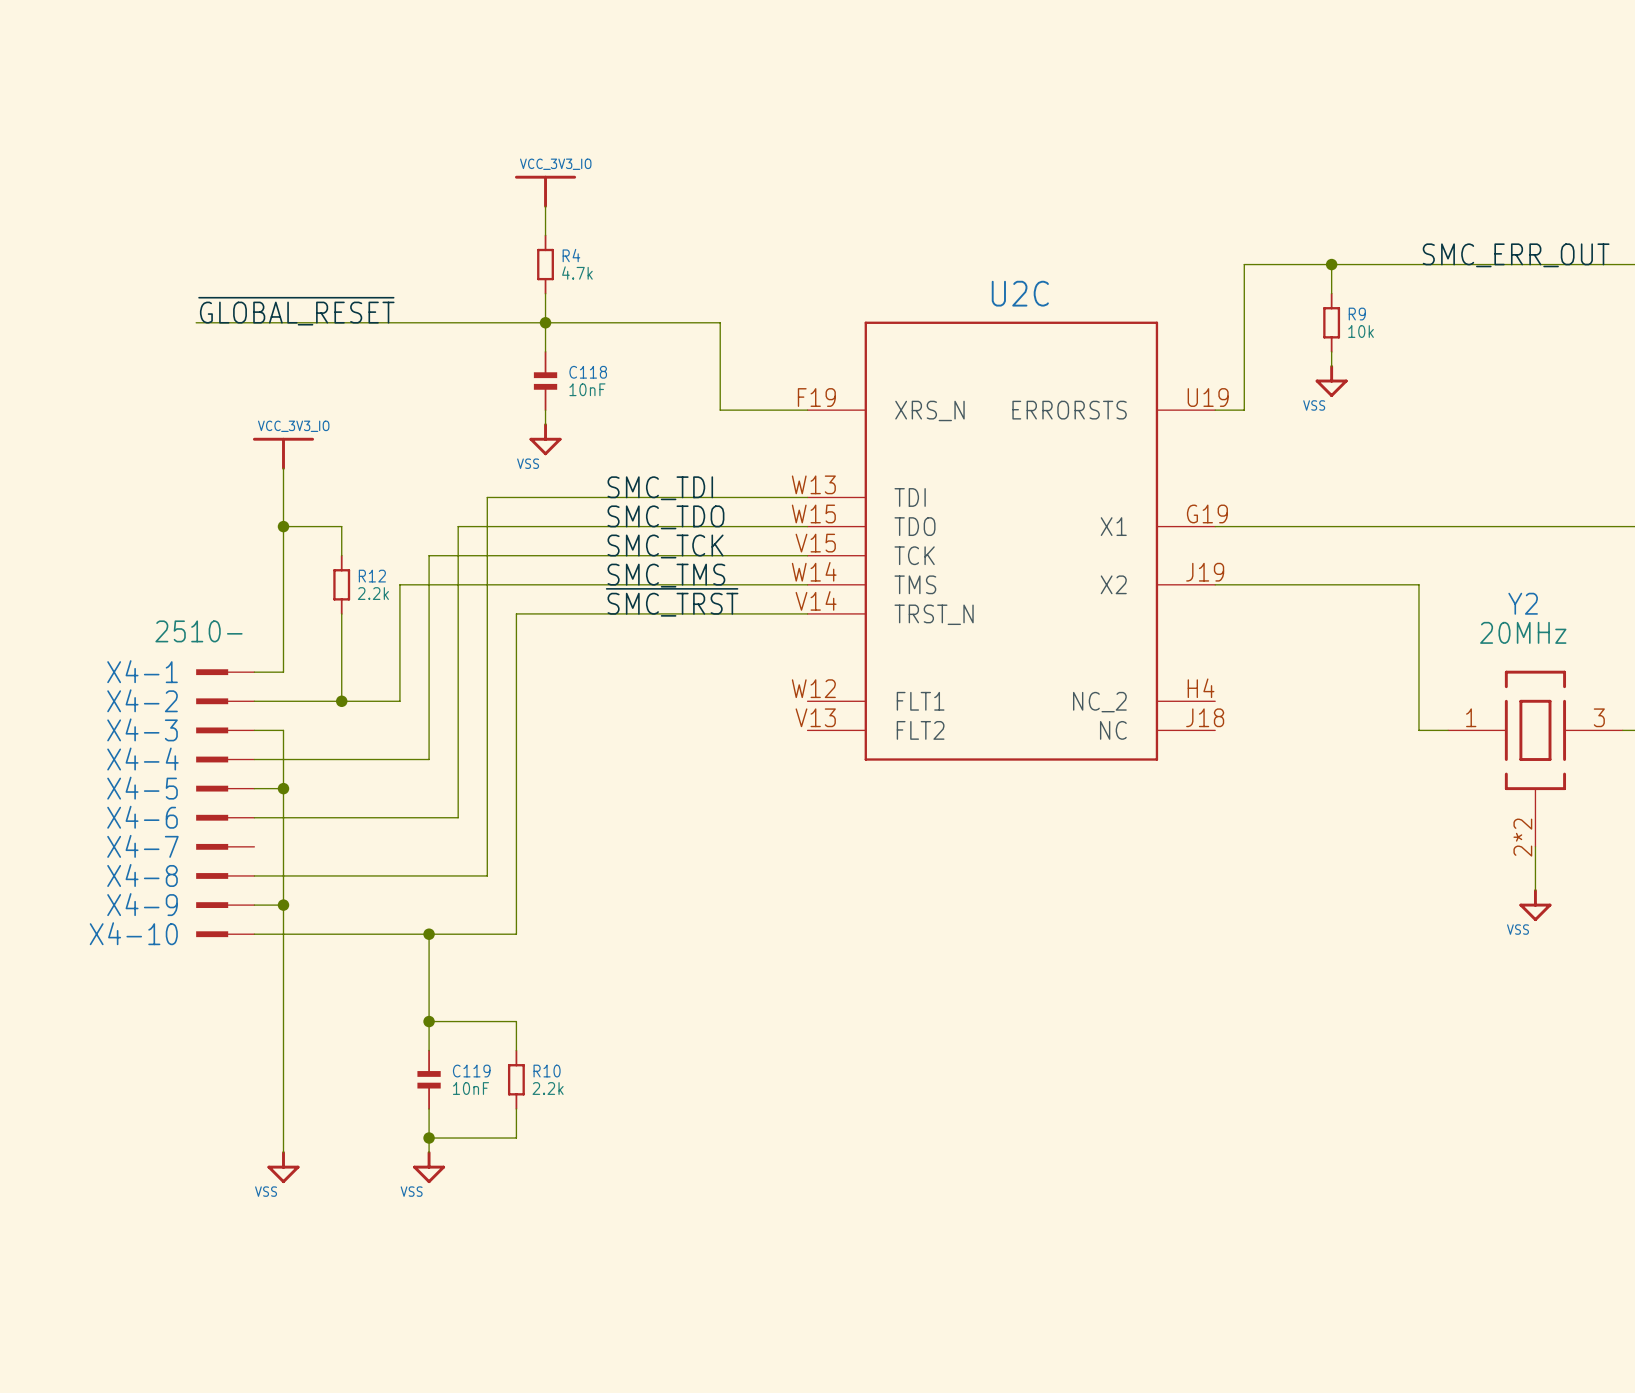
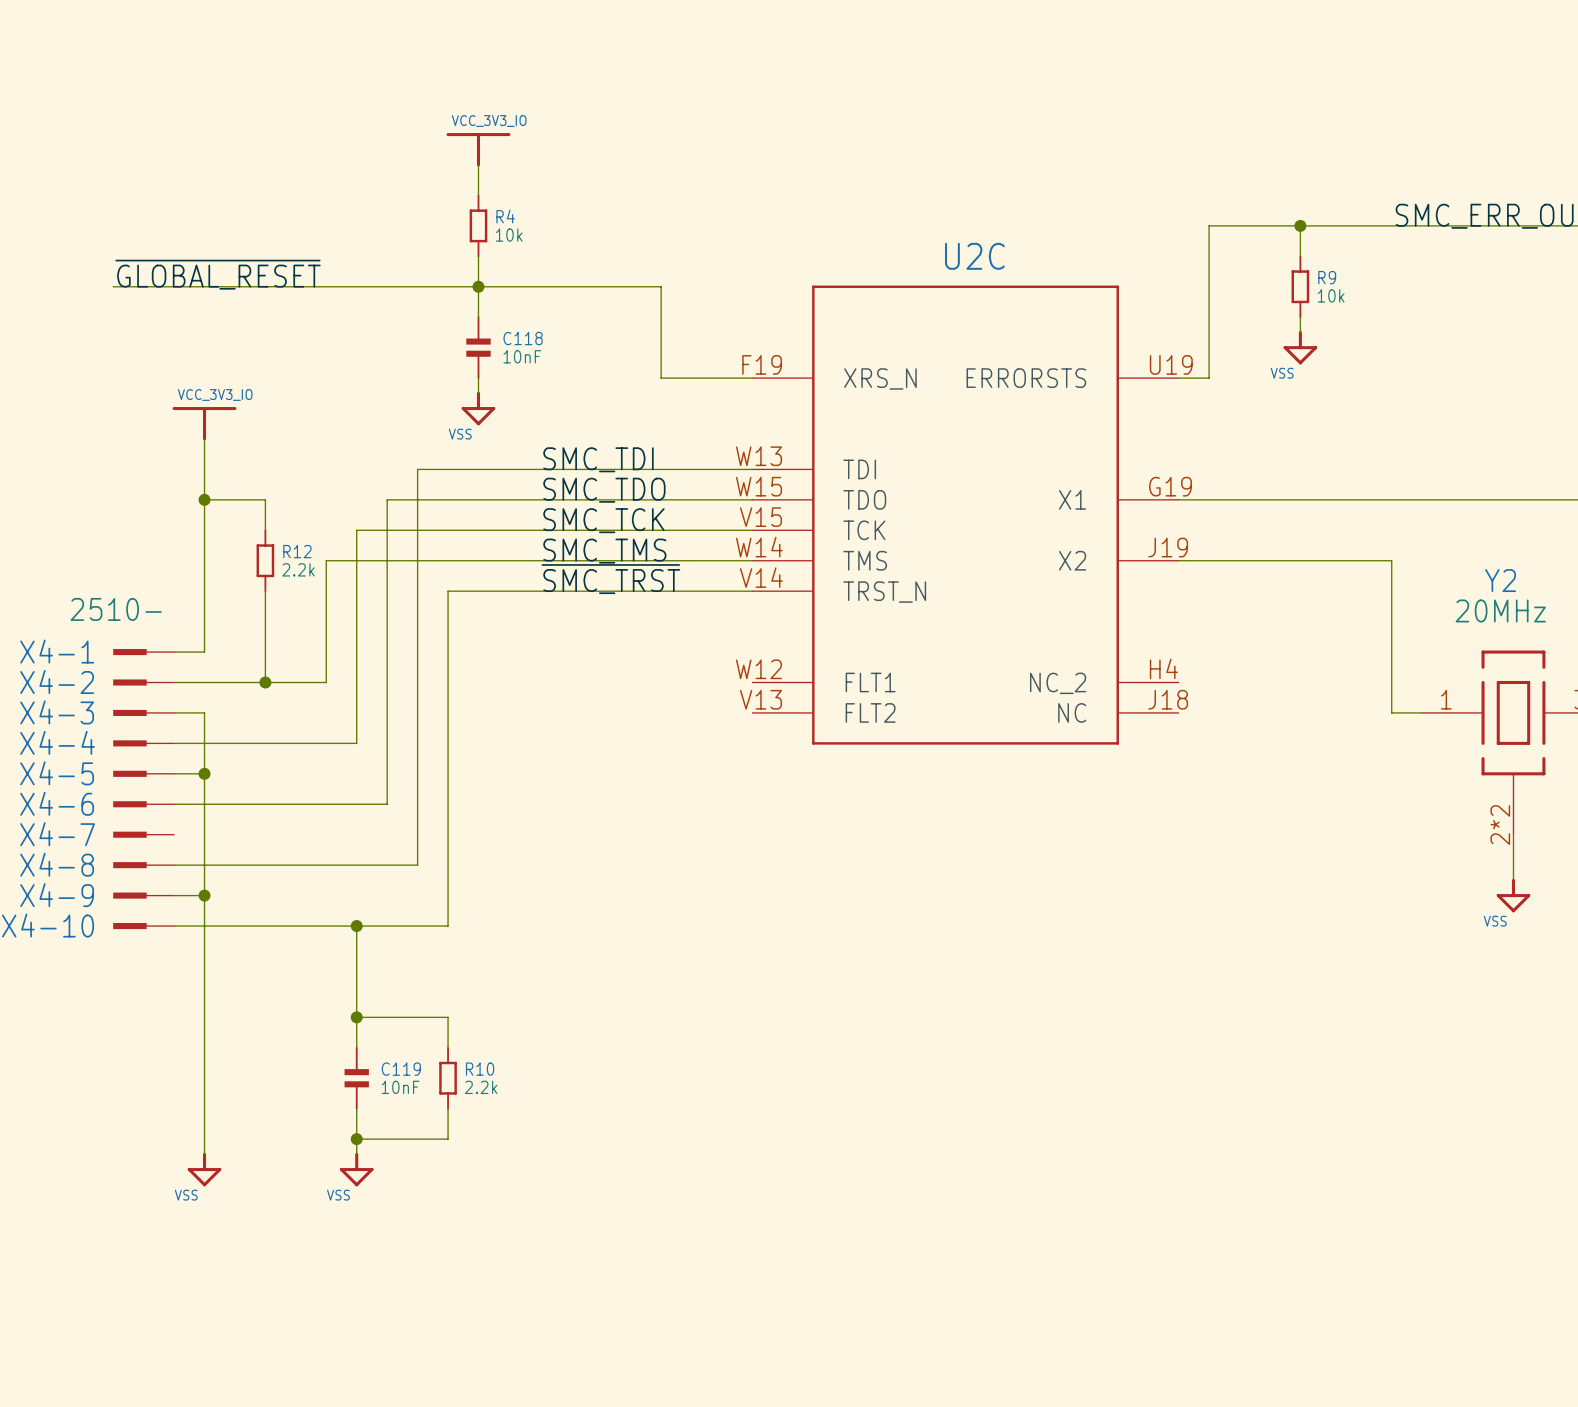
R4 value: 4.7k (577, 273) -> 10k (509, 235)

